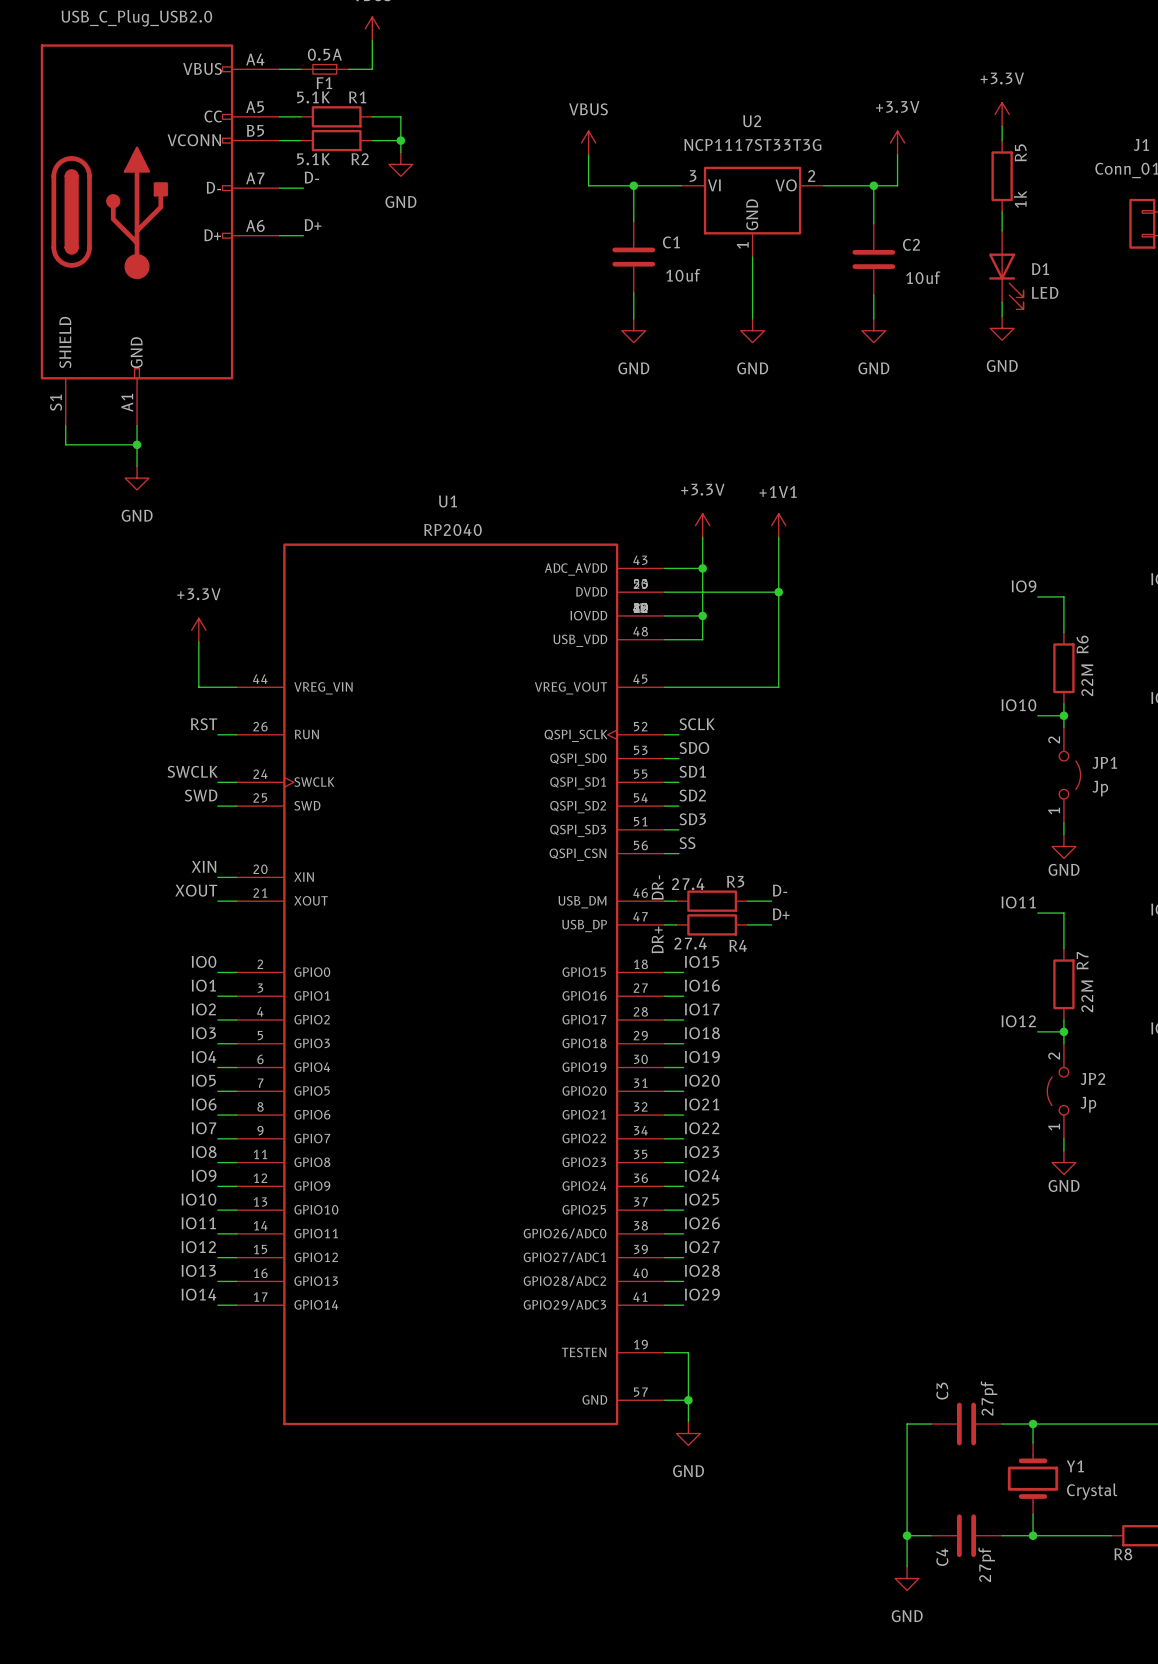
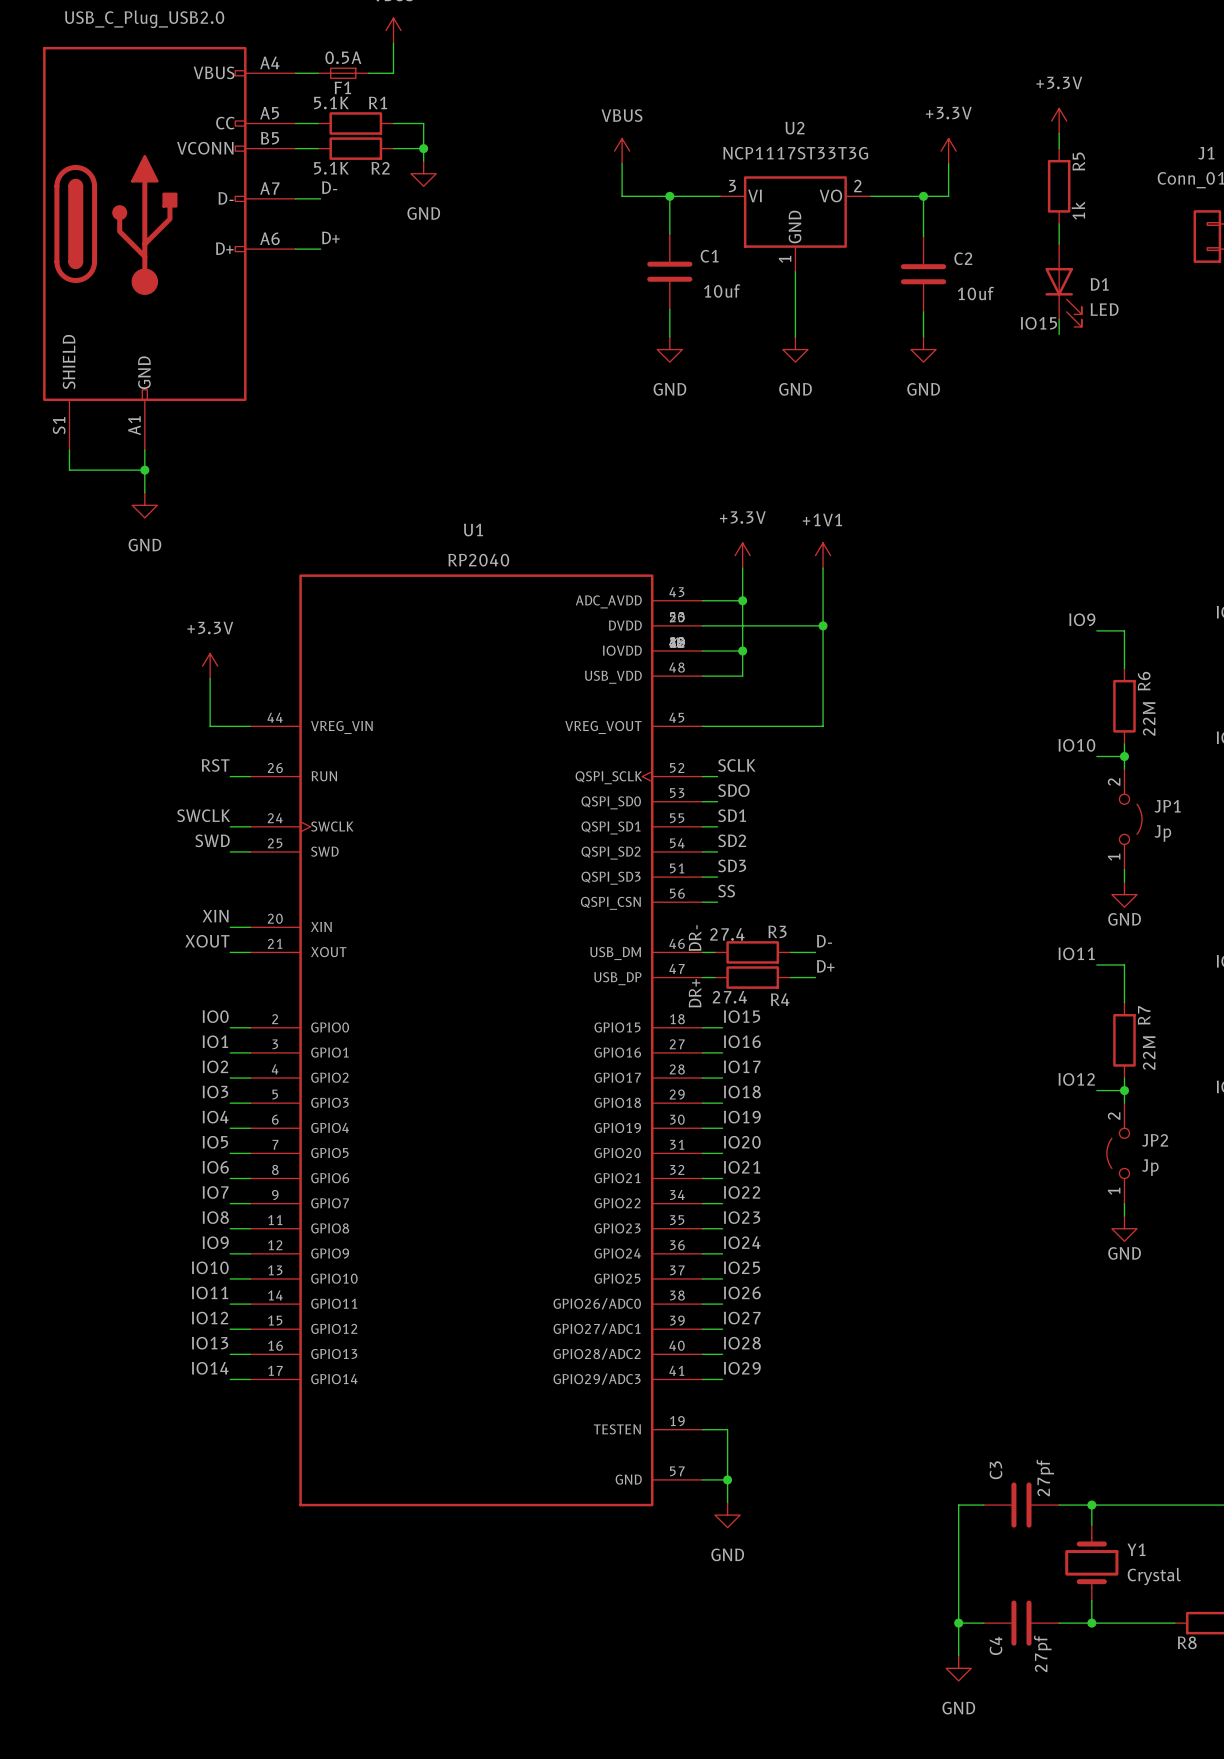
label: none -> IO15 (1038, 323)
power symbol: GND (1002, 328) -> none

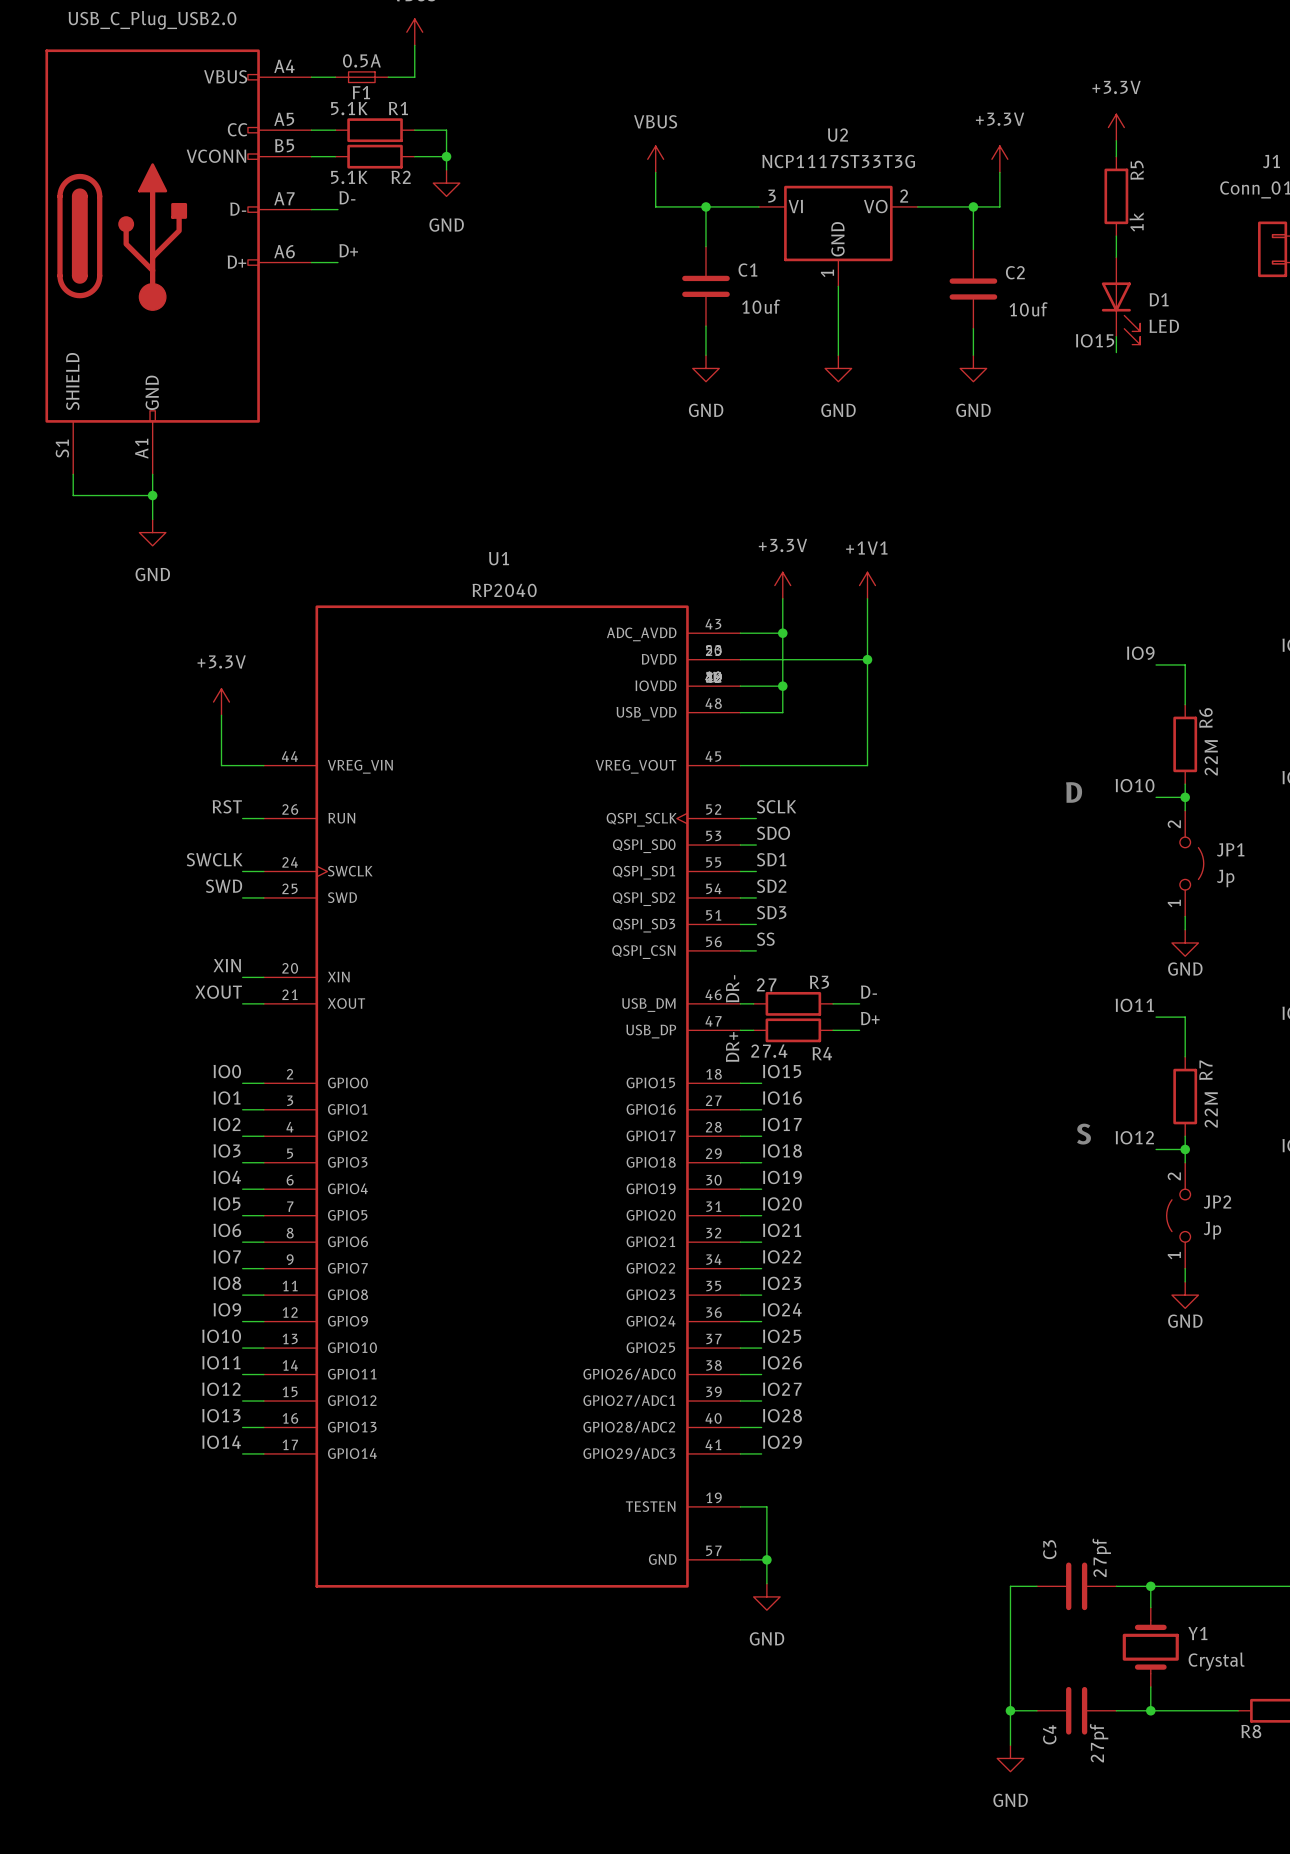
text: none -> D (1074, 792)
R3 value: 27.4 (727, 934) -> 27 (766, 984)
text: none -> S (1084, 1134)

